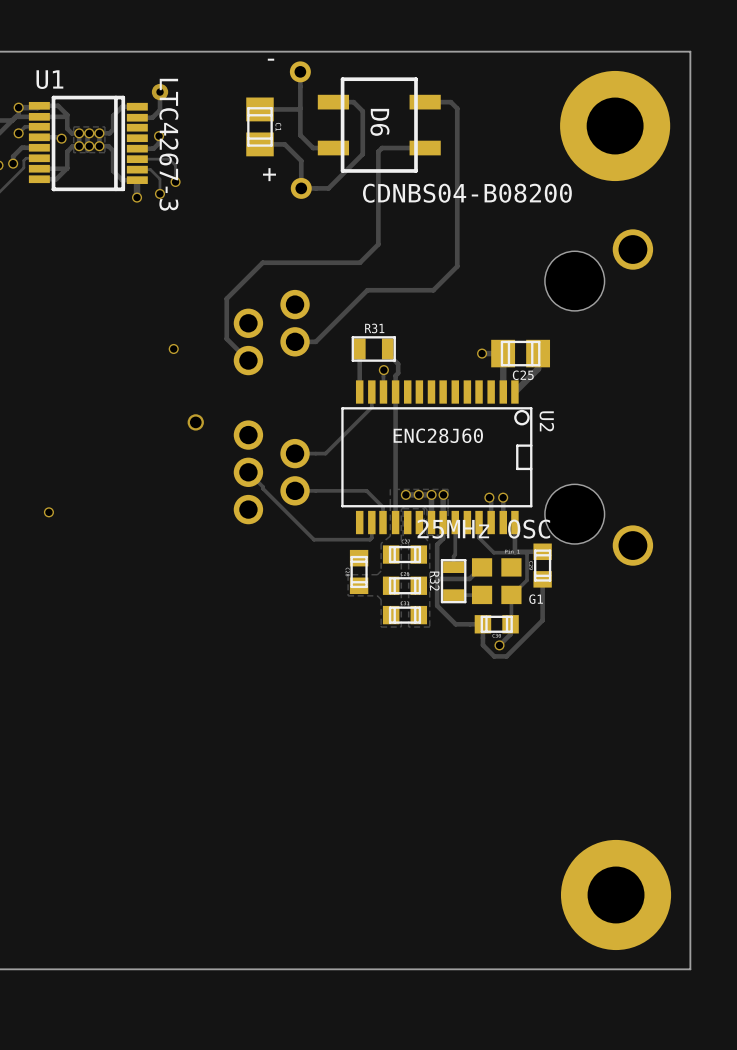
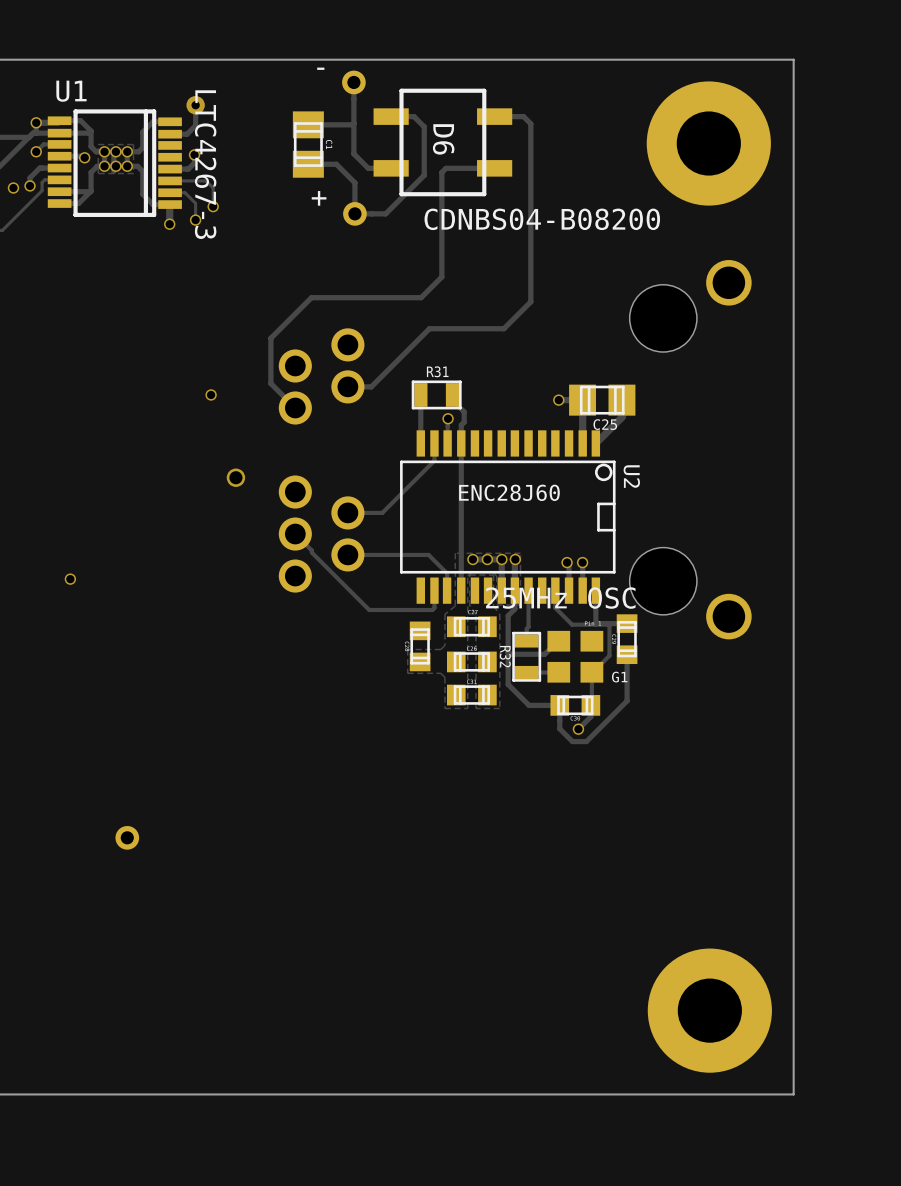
part: none -> (127, 837)

